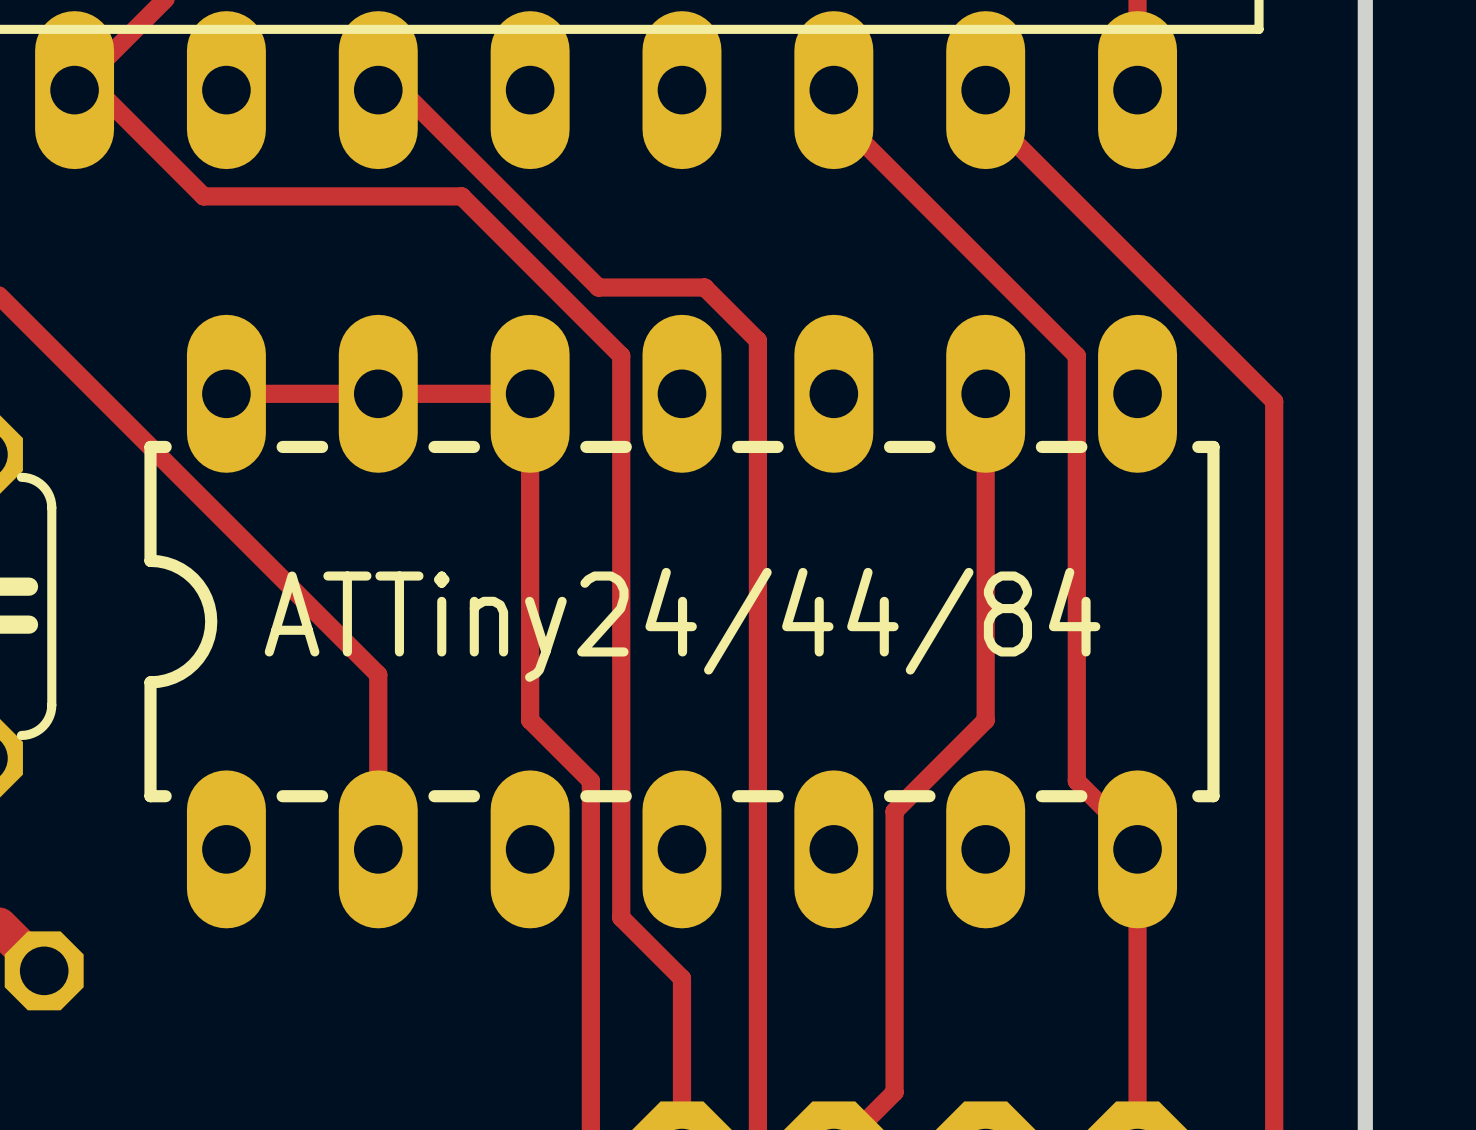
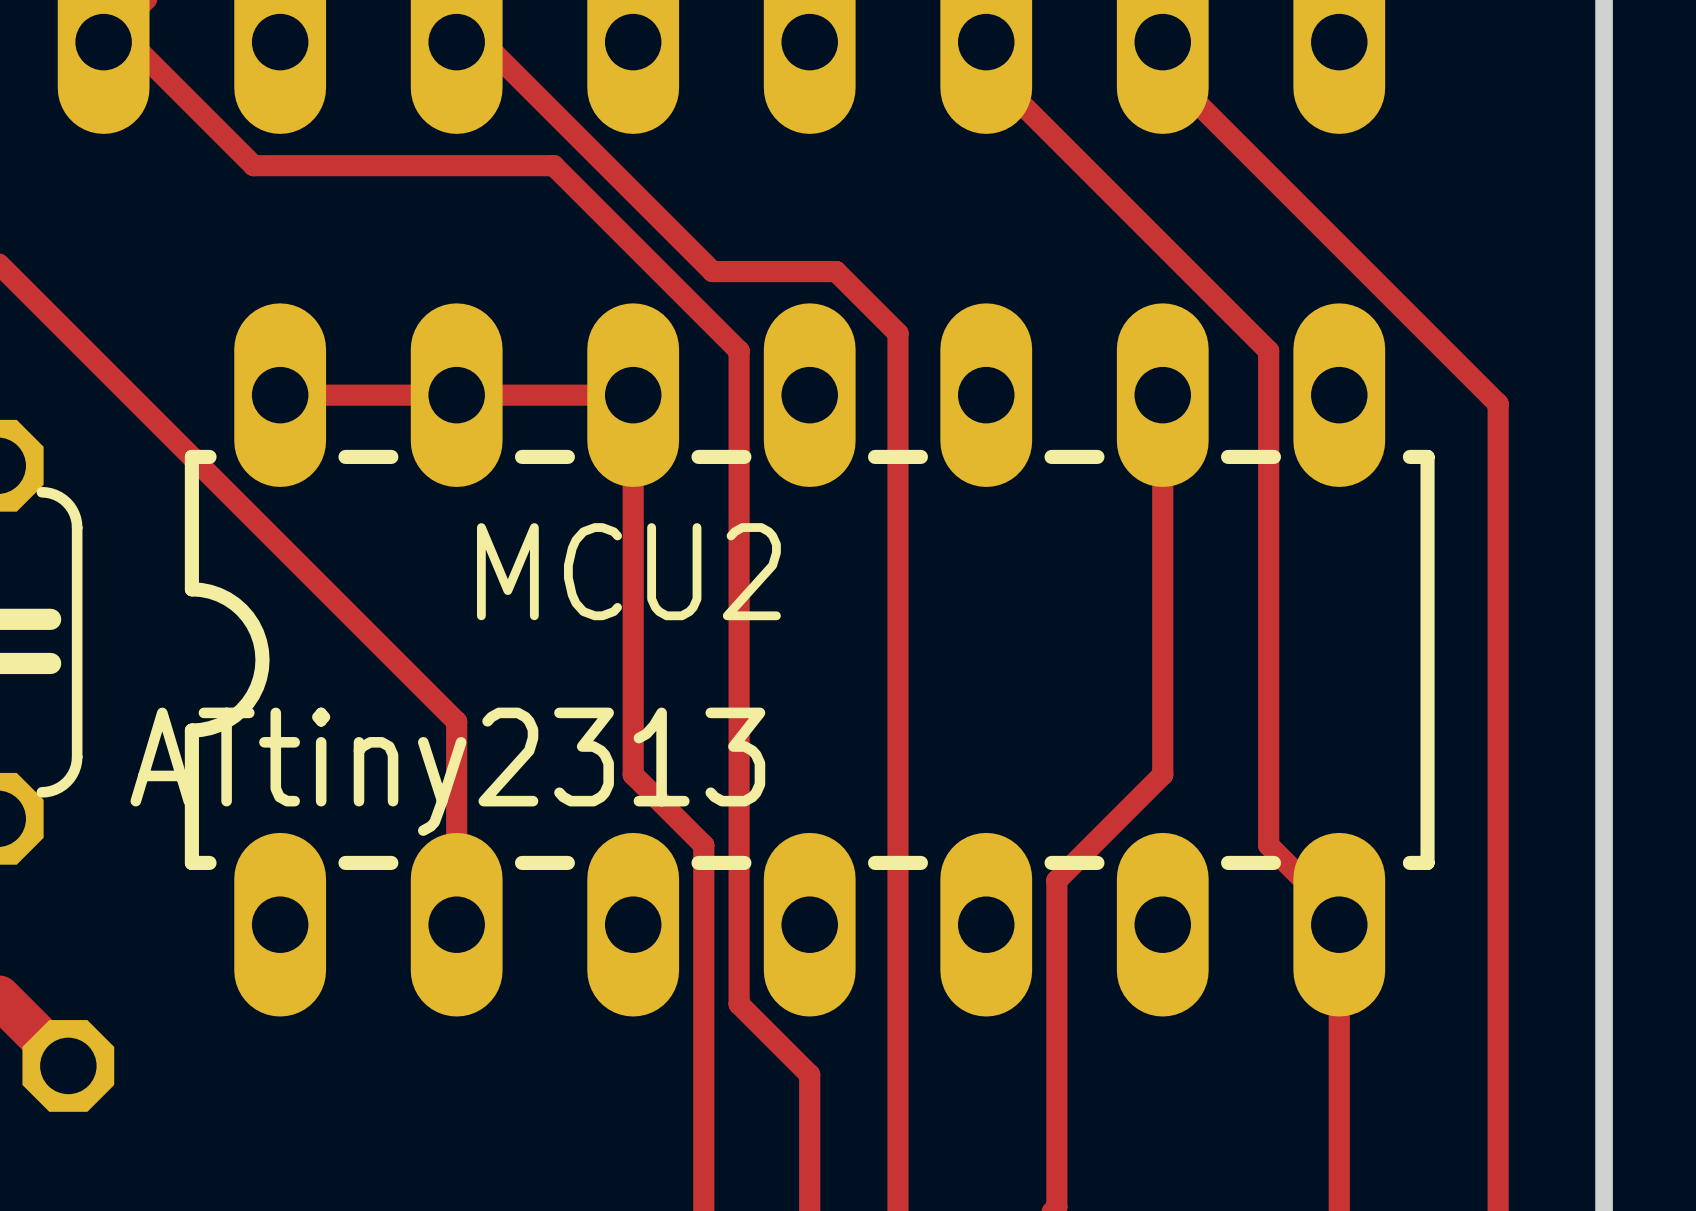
MCU2 name: none -> MCU2 (628, 571)
text: ATTiny24/44/84 (682, 624) -> none
text: none -> ATtiny2313 (447, 771)

